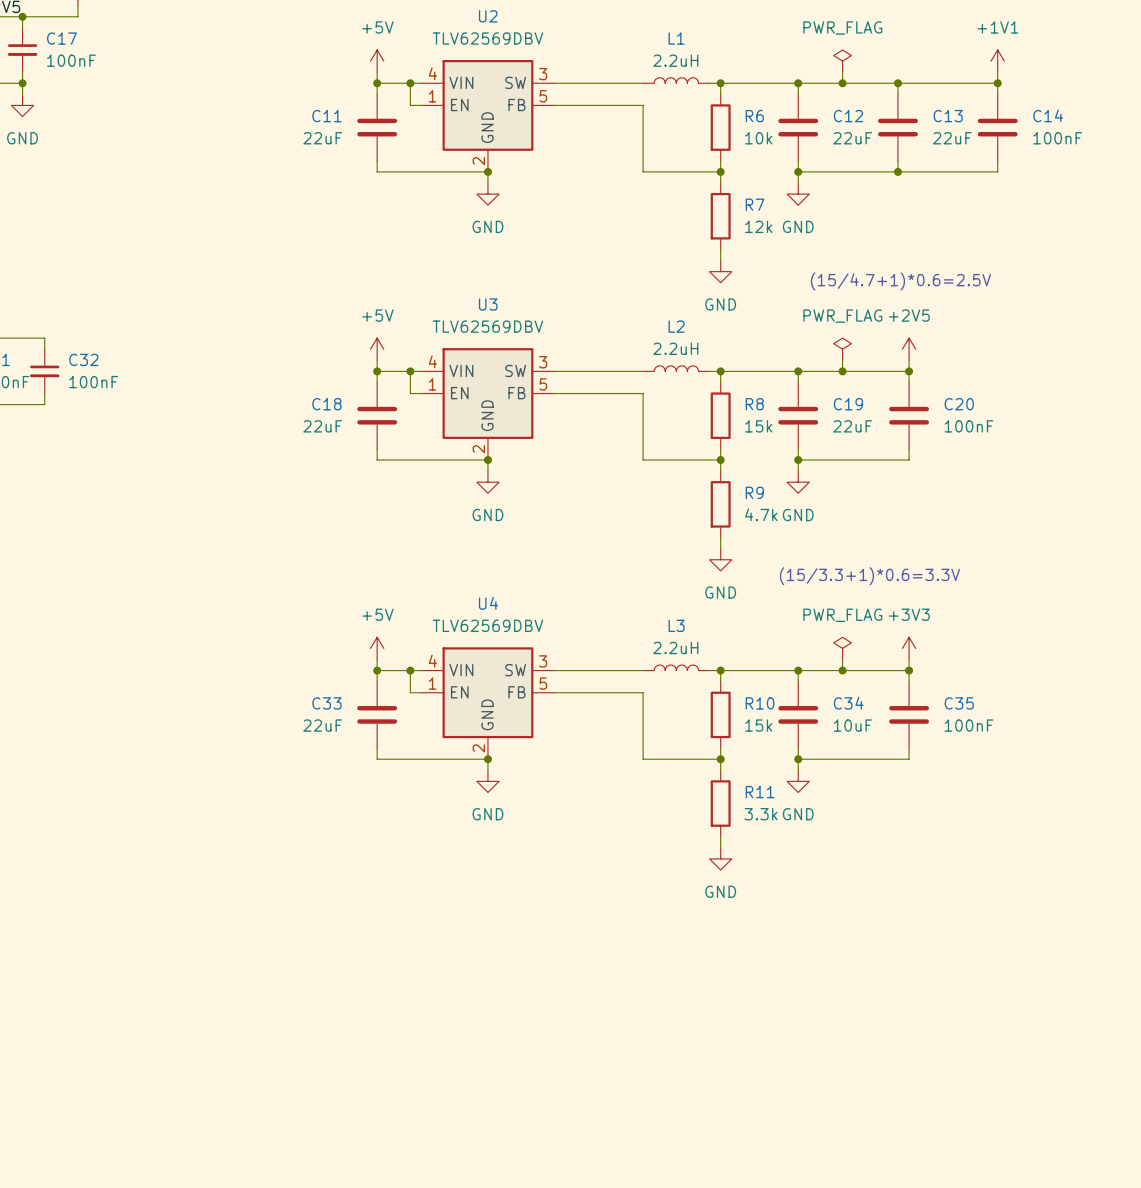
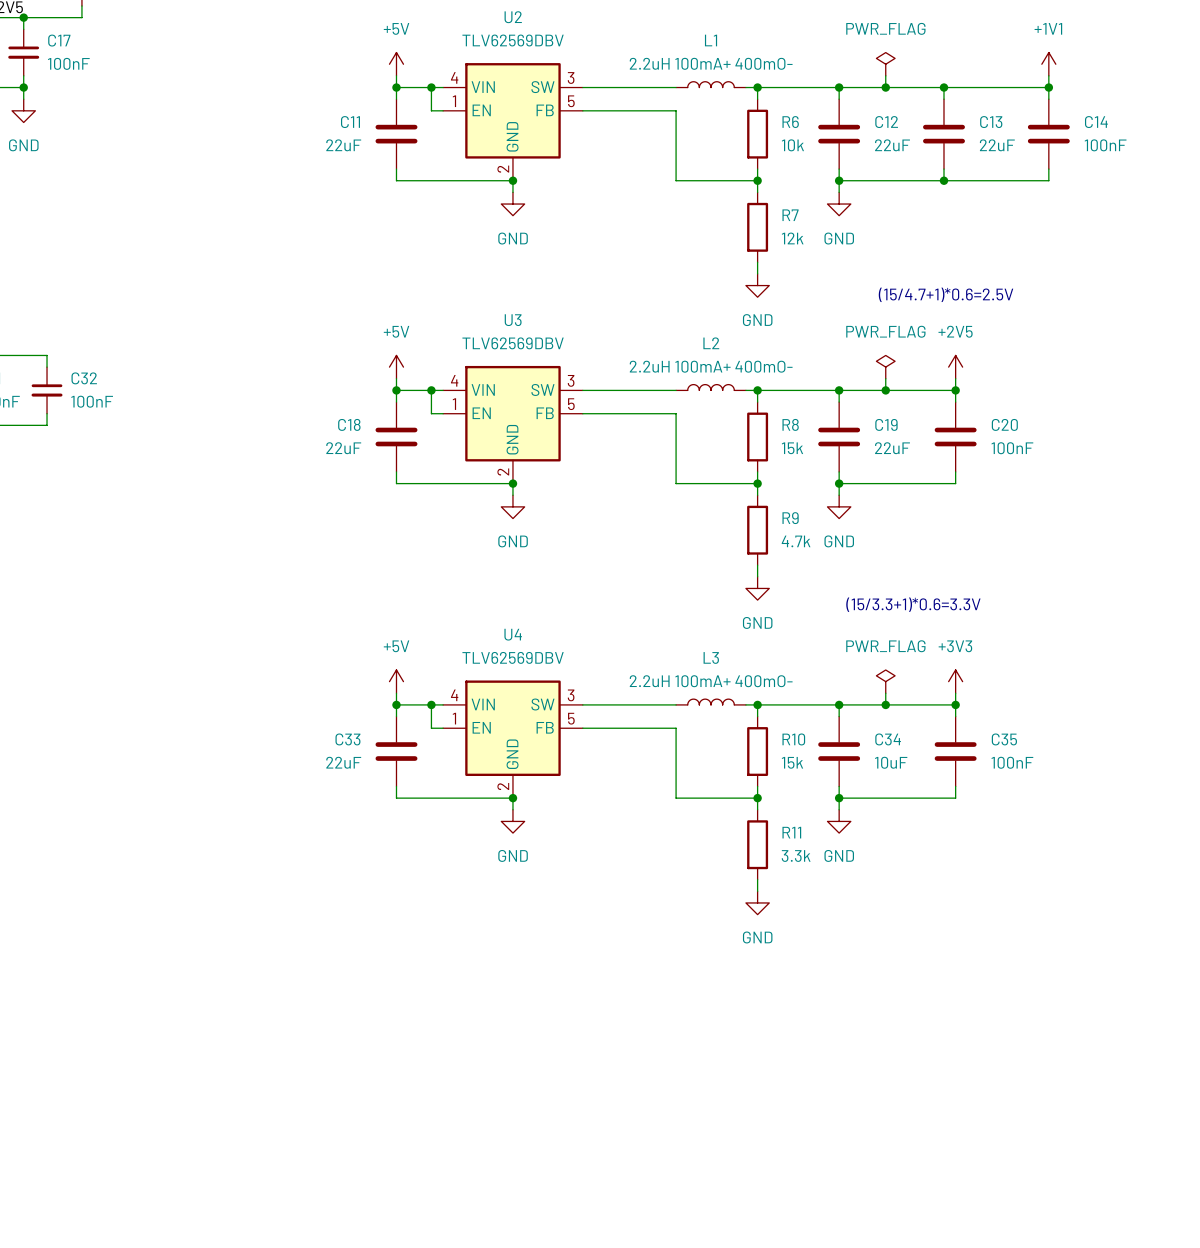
L1 value: 2.2uH (675, 60) -> 2.2uH 100mA+ 400mO- (711, 63)
L2 value: 2.2uH (675, 348) -> 2.2uH 100mA+ 400mO- (711, 366)
L3 value: 2.2uH (675, 647) -> 2.2uH 100mA+ 400mO- (711, 681)

